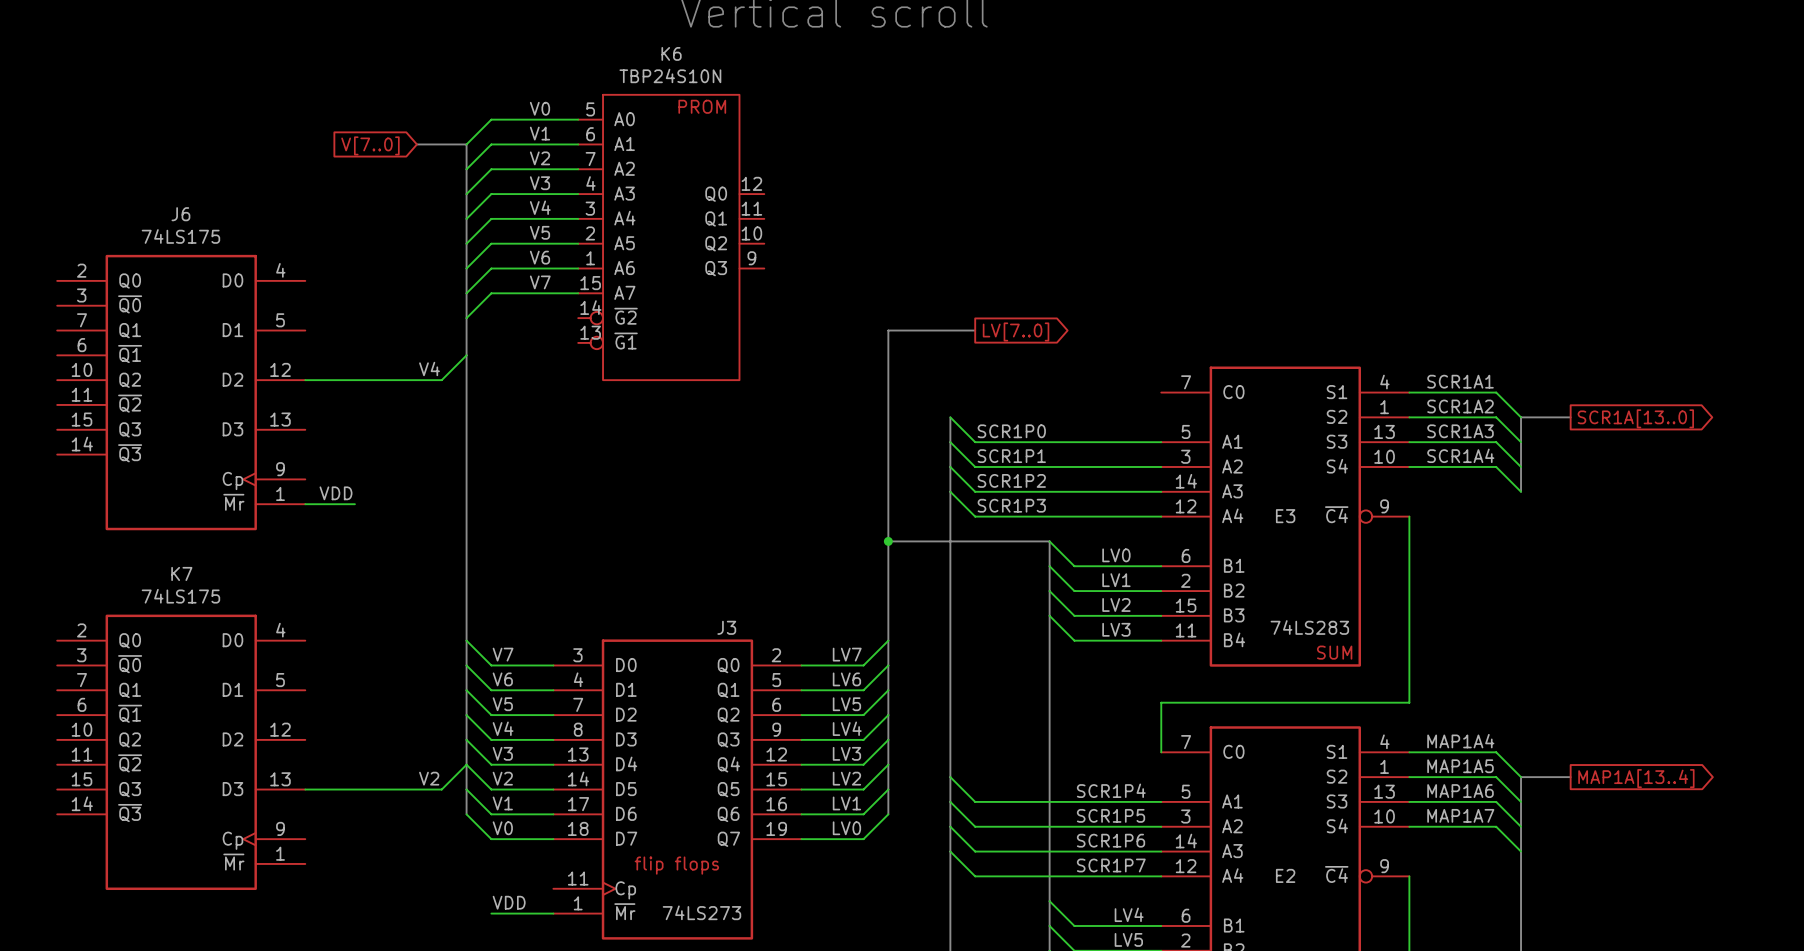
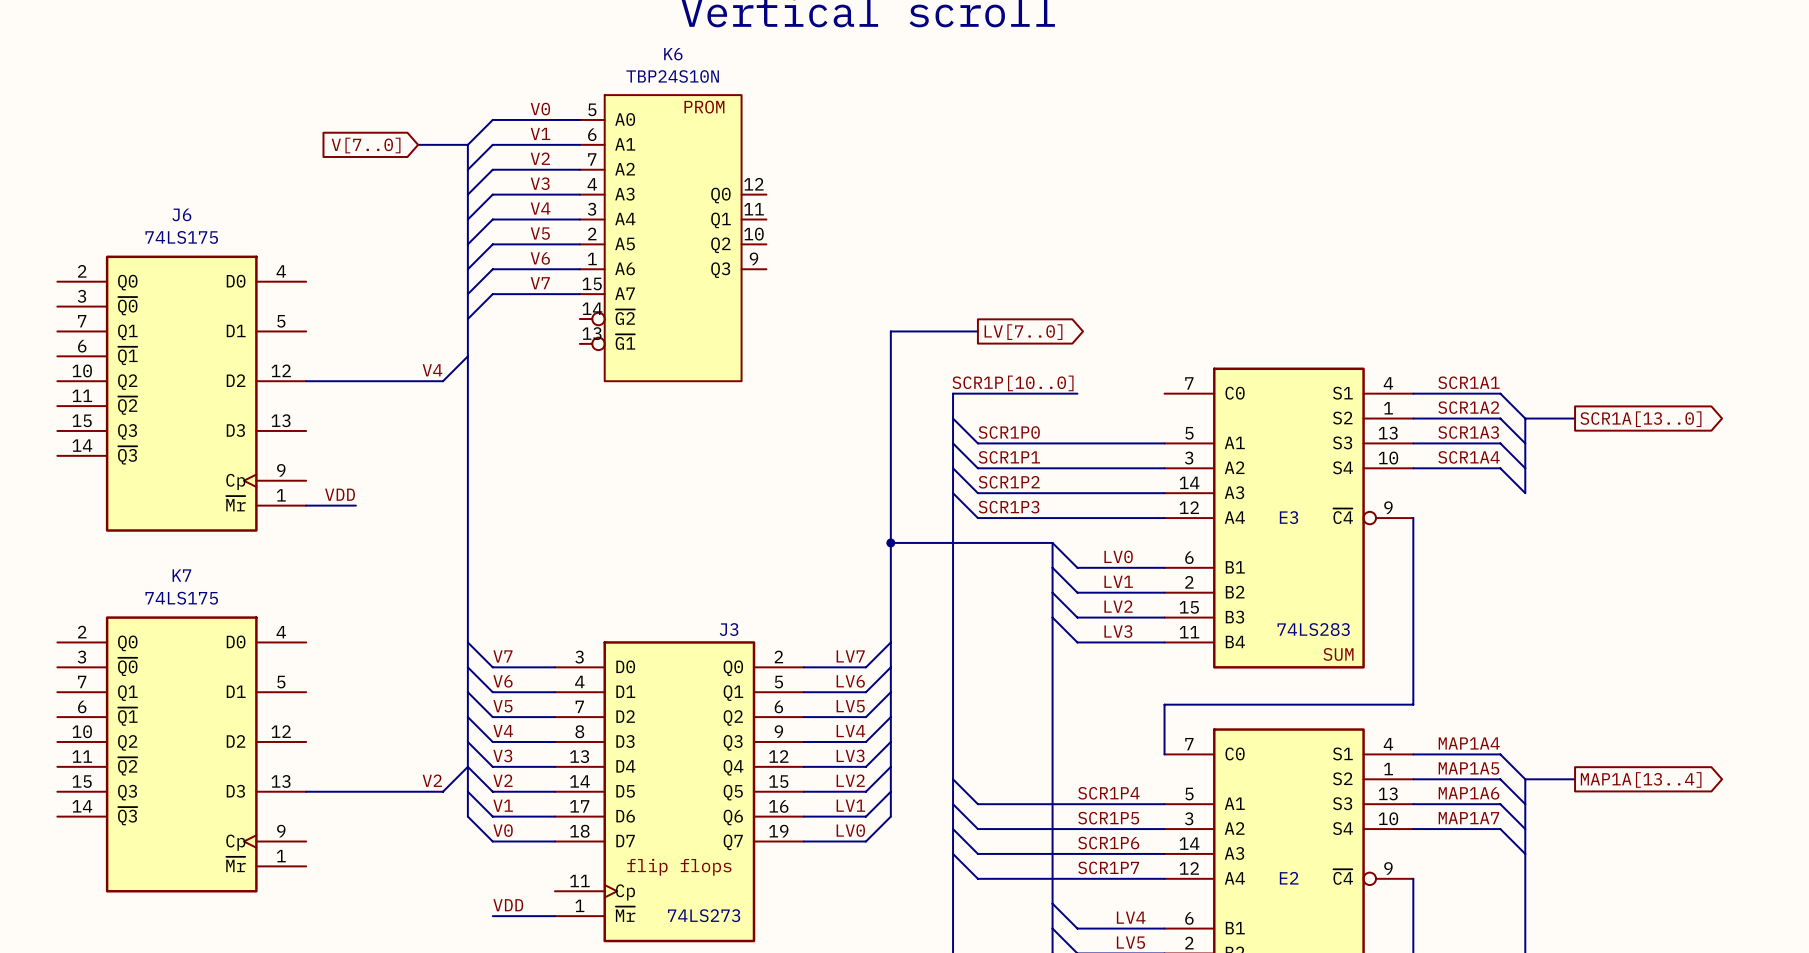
label: none -> SCR1P[10..0] (1012, 383)
bus: none -> (1077, 393) (953, 393) (953, 418)

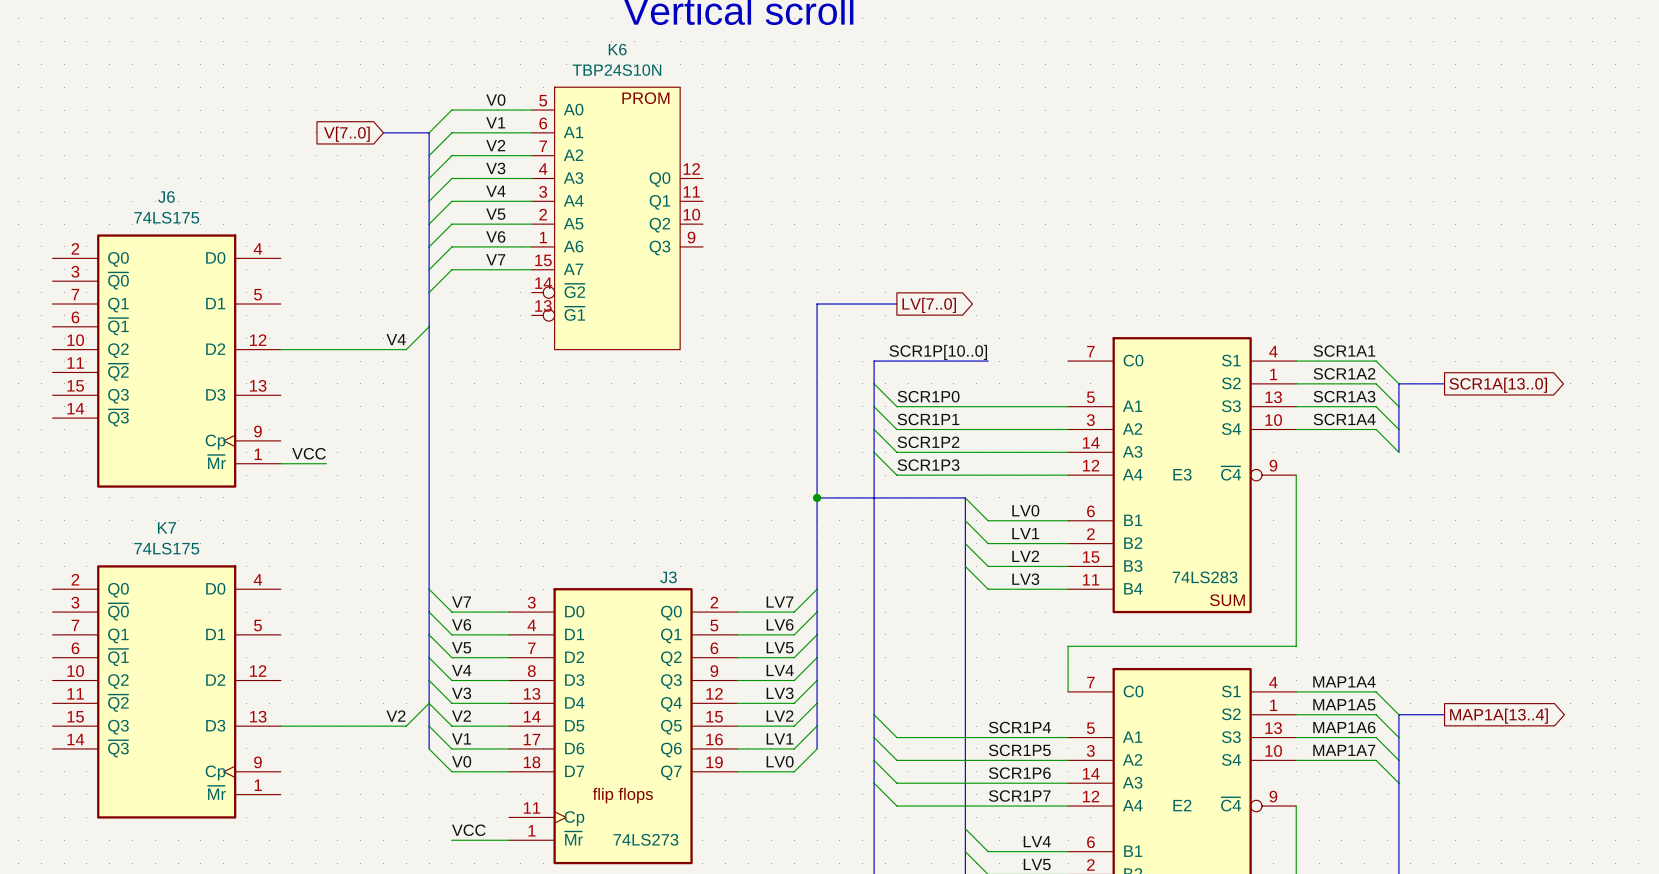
label: VDD (340, 494) -> VCC (309, 453)
label: VDD (508, 905) -> VCC (468, 830)

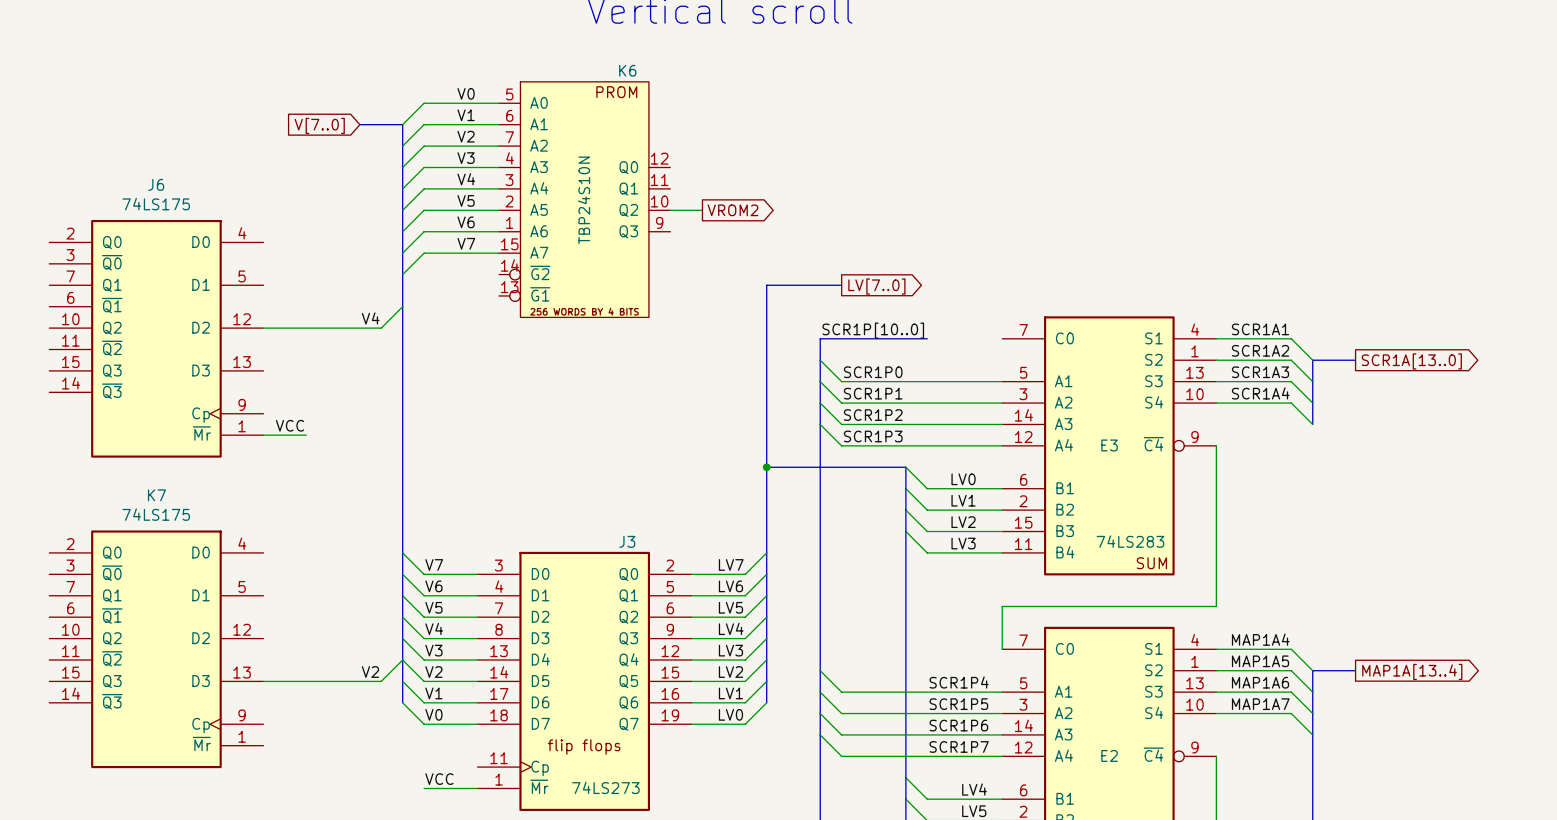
K6 name position: K6 (617, 49) -> K6 (627, 70)
K6 value position: TBP24S10N (616, 70) -> TBP24S10N (584, 200)
K6 symbol: [531, 87, 703, 350] -> [499, 81, 671, 318]
wire: none -> (670, 210) (702, 210)
global label: none -> VROM2 (732, 210)

